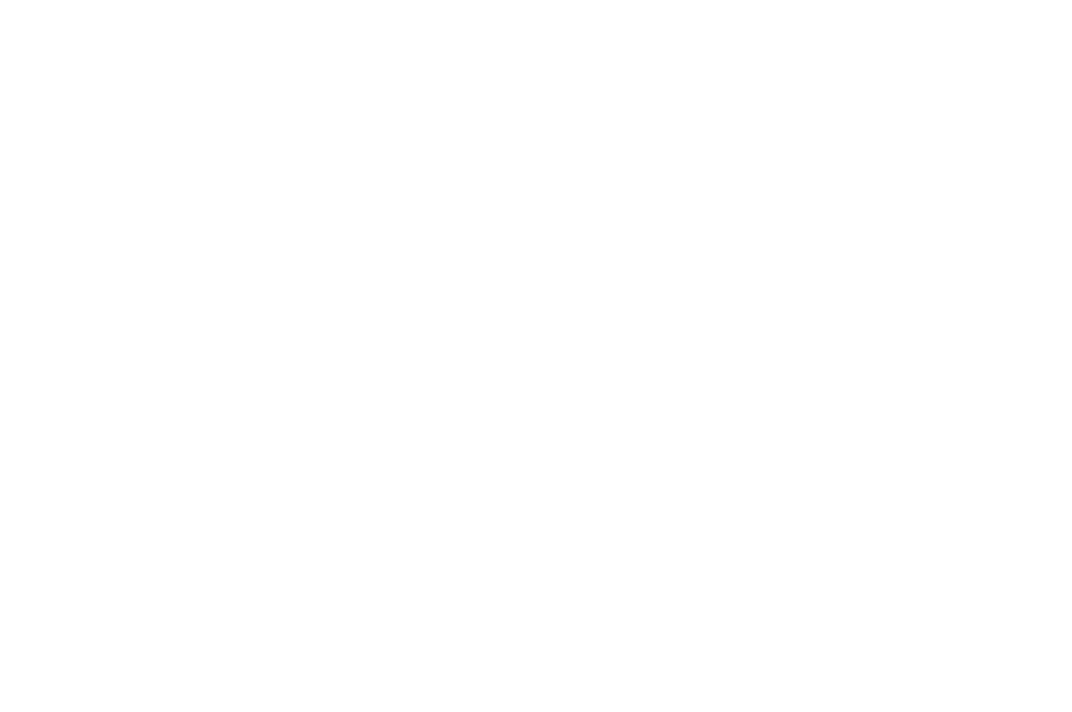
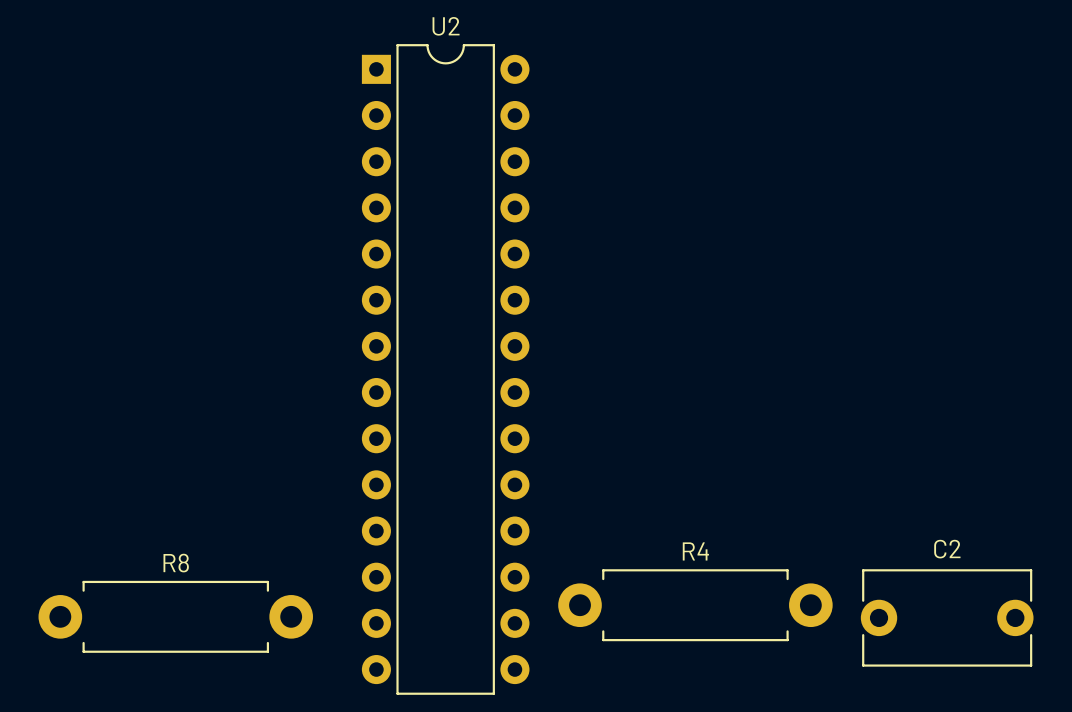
U2: none -> (445, 369)
R4: none -> (695, 605)
R8: none -> (175, 616)
C2: none -> (947, 617)

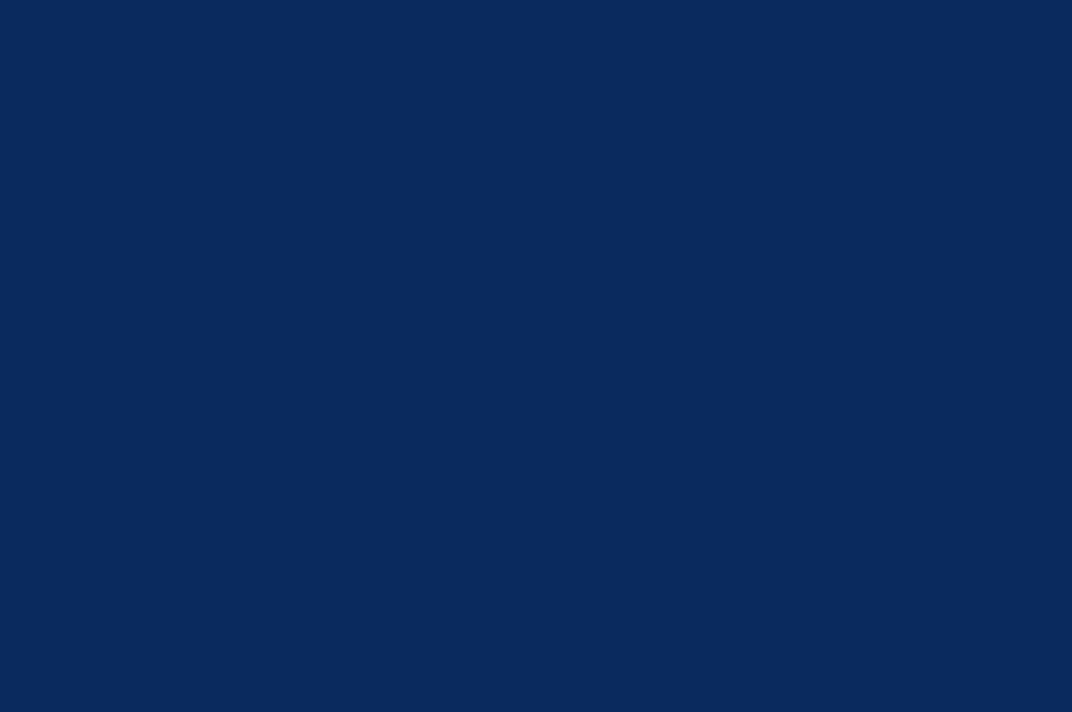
U2: (445, 369) -> none
R4: (695, 605) -> none
R8: (175, 616) -> none
C2: (947, 617) -> none

